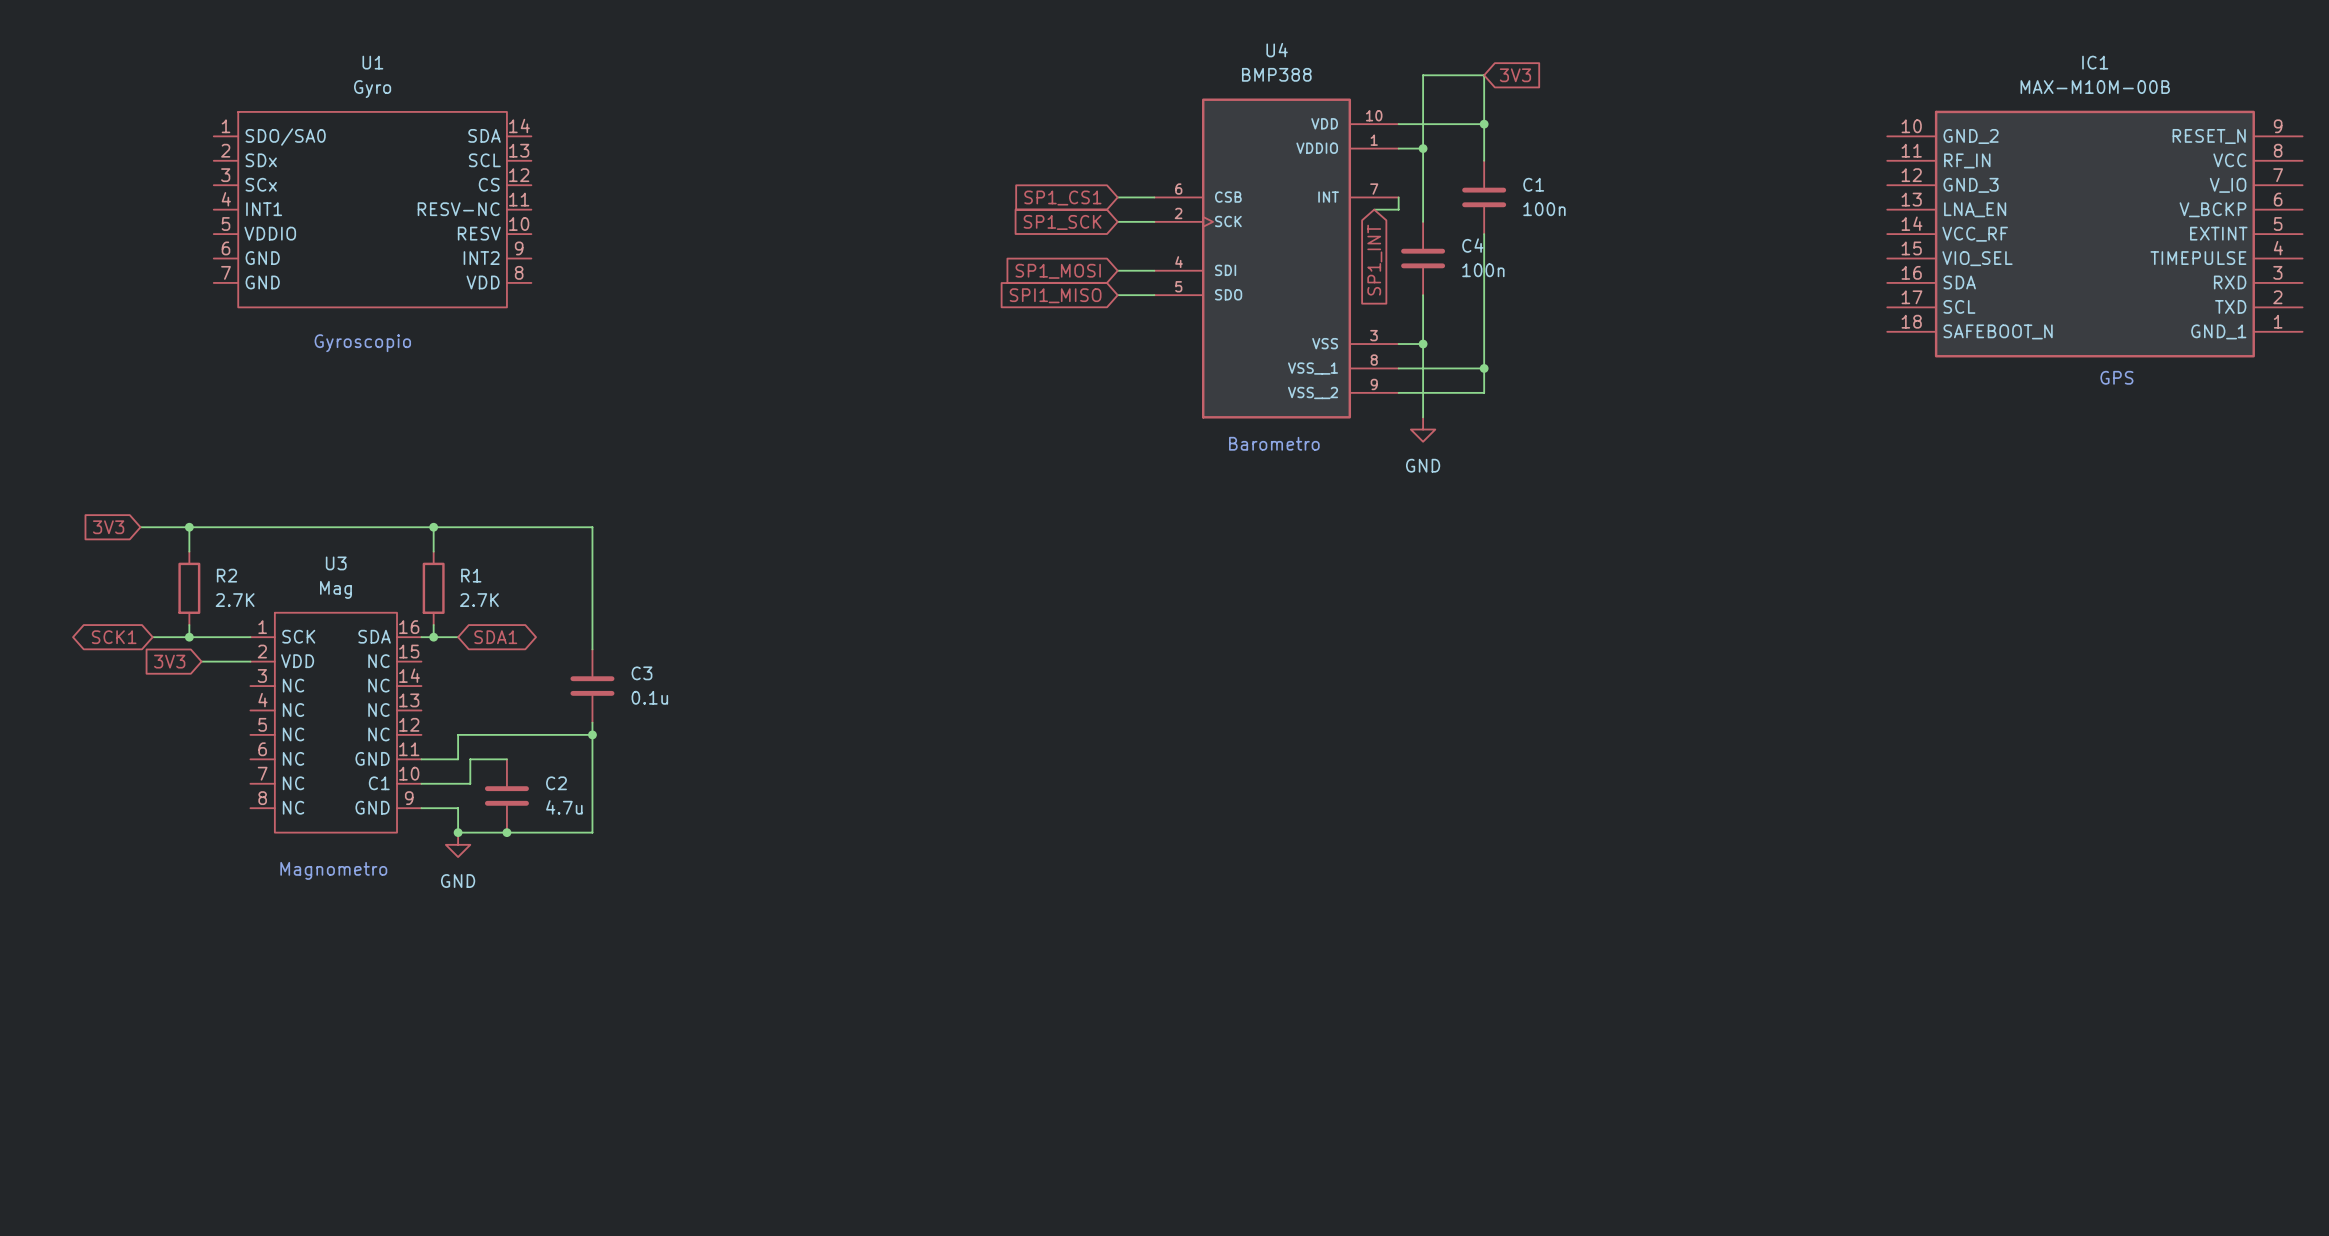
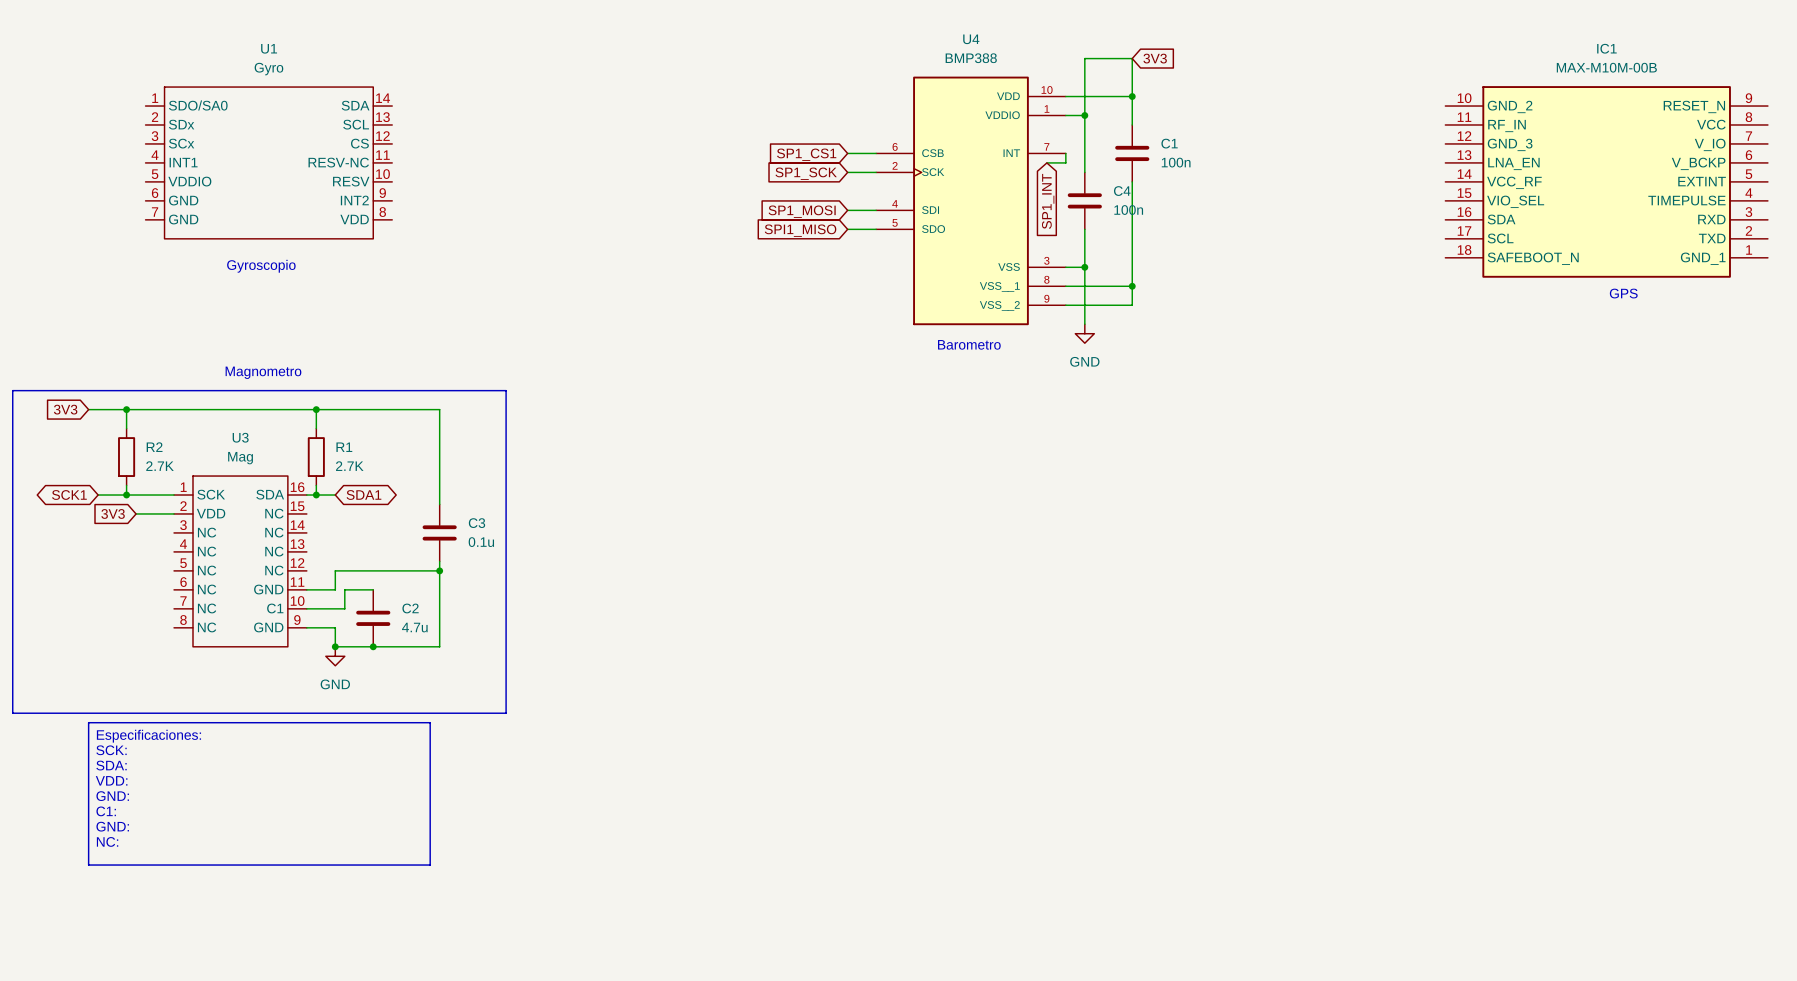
text: none -> Magnometro (263, 372)
line: none -> (12, 390) (506, 390) (506, 713) (12, 713) (12, 390)
text: Magnometro (333, 870) -> none
line: none -> (88, 722) (430, 722) (430, 865) (88, 865) (88, 722)
text: none -> Especificaciones: (148, 736)
text: none -> SCK: (111, 750)
text: none -> SDA: (111, 765)
text: none -> VDD: (111, 780)
text: none -> GND: (112, 796)
text: none -> C1: (106, 811)
text: none -> GND: (112, 826)
text: none -> NC: (107, 841)

